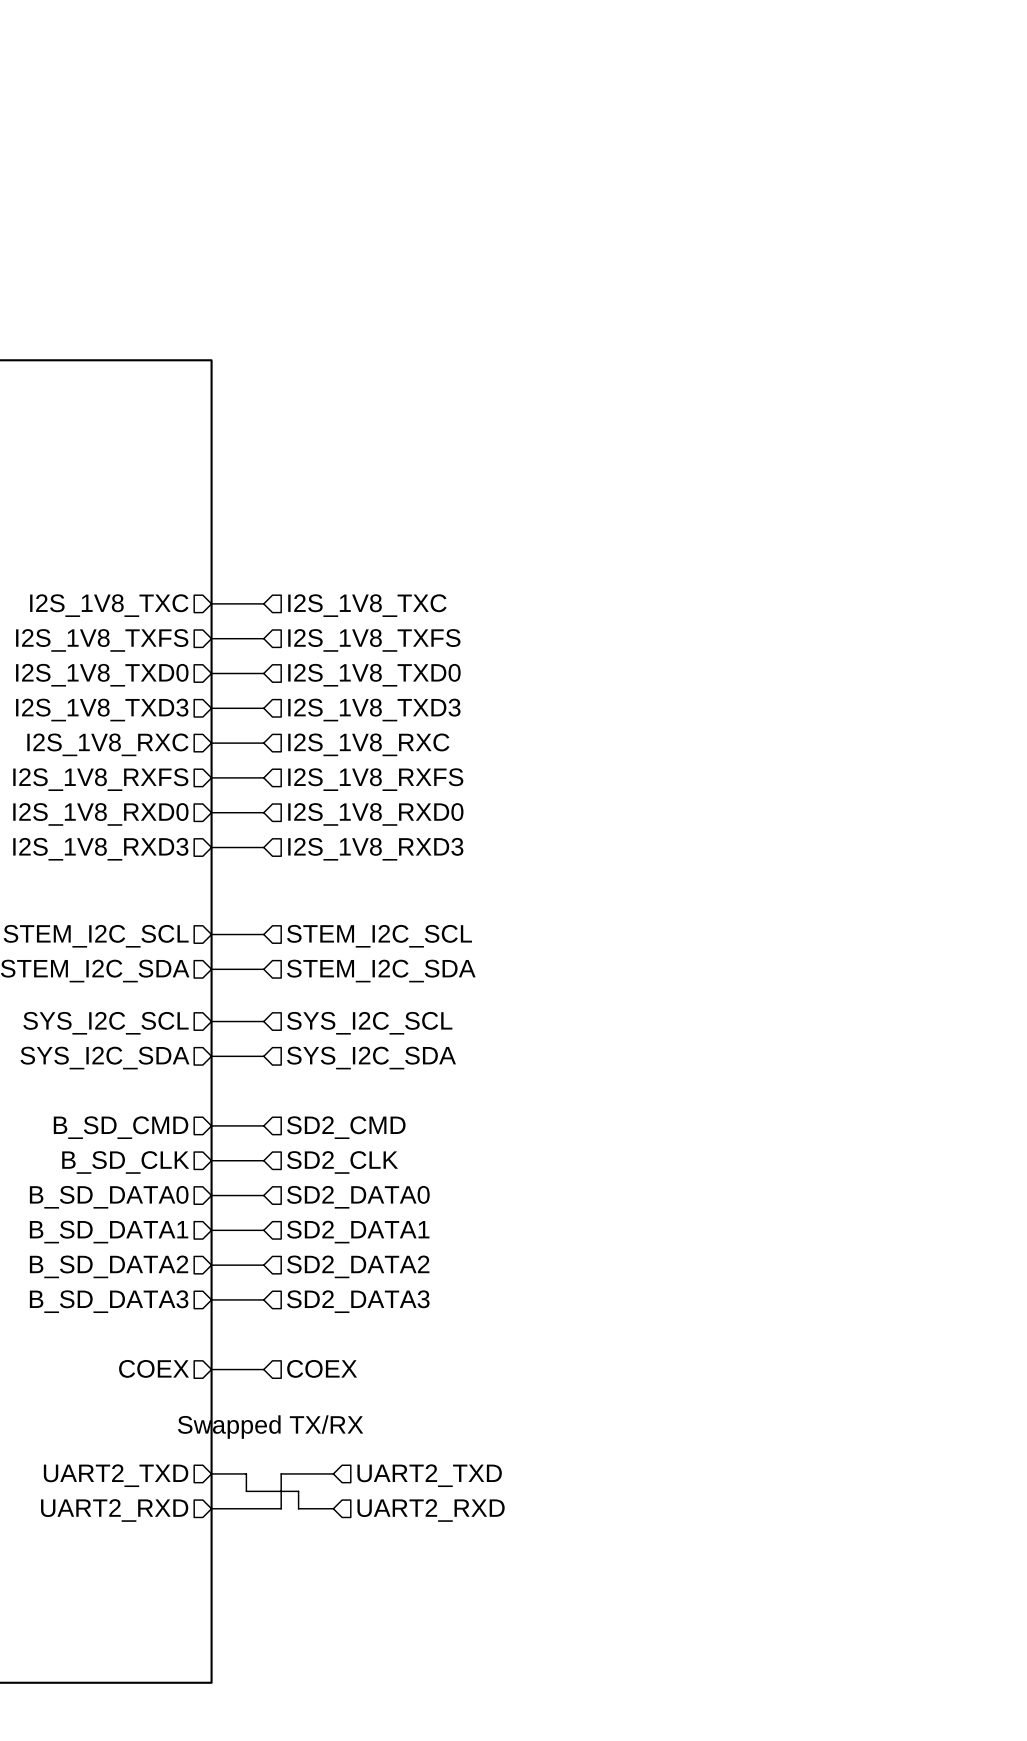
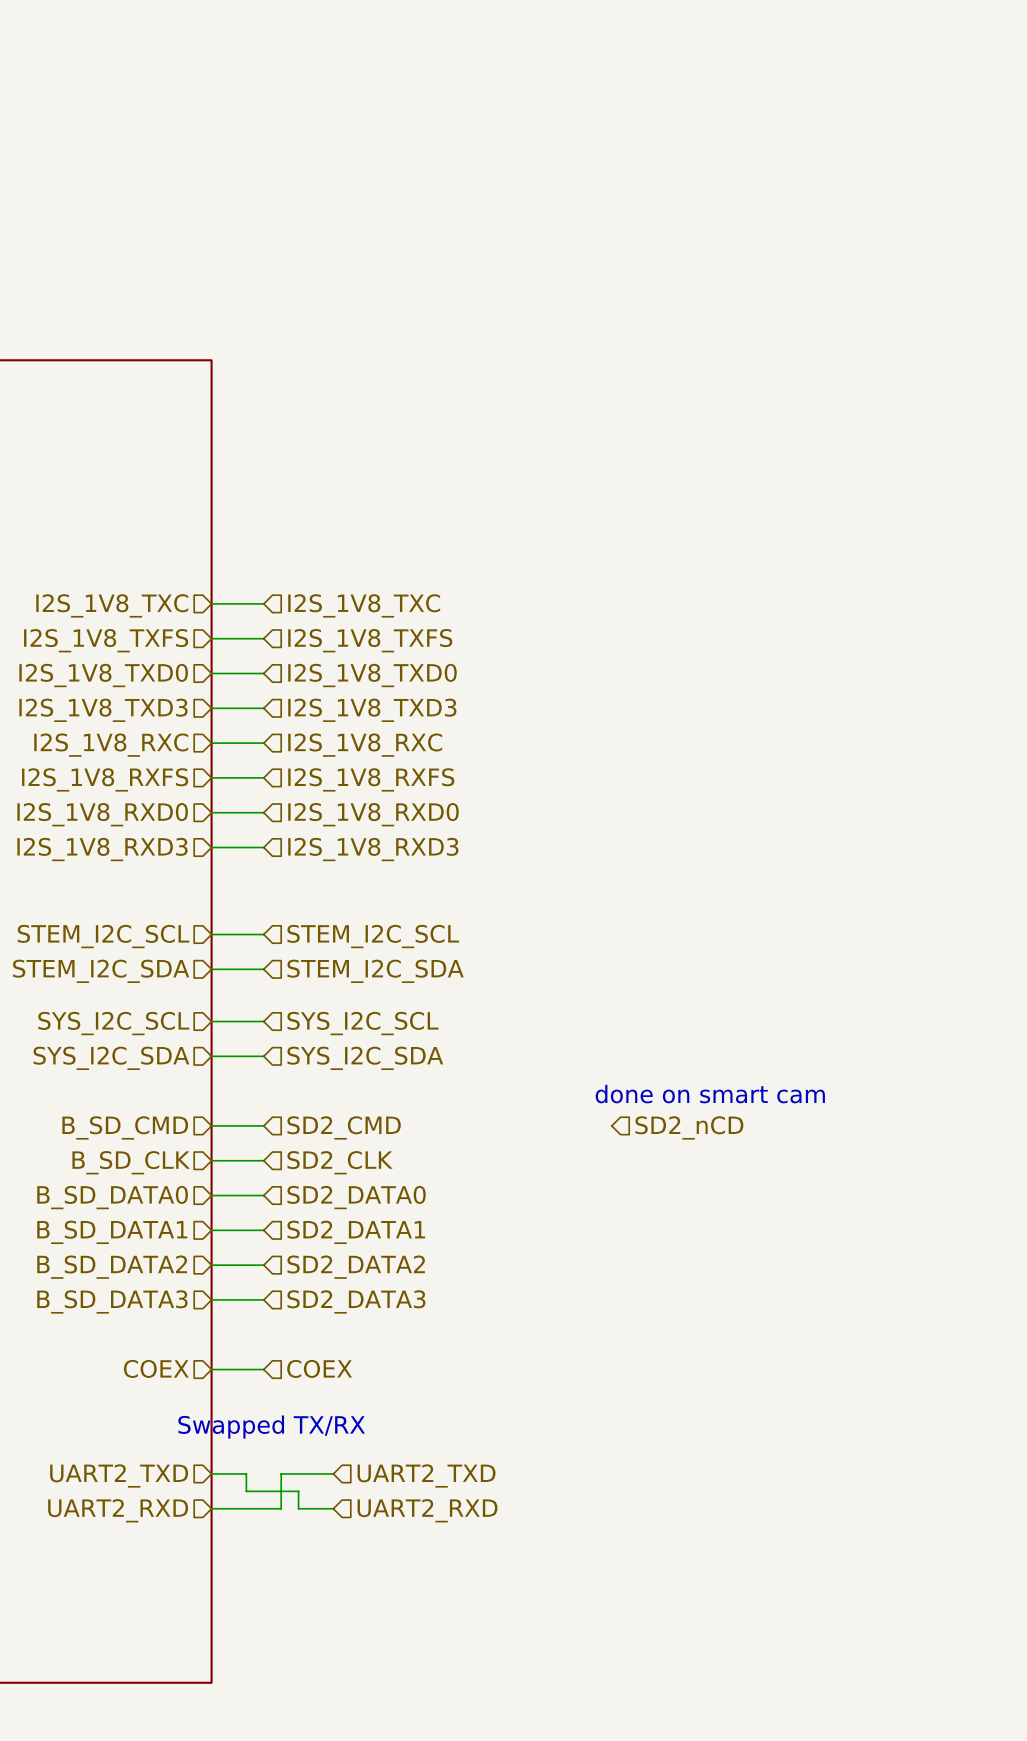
text: none -> done on smart cam (710, 1094)
hierarchical label: none -> SD2_nCD (689, 1127)

